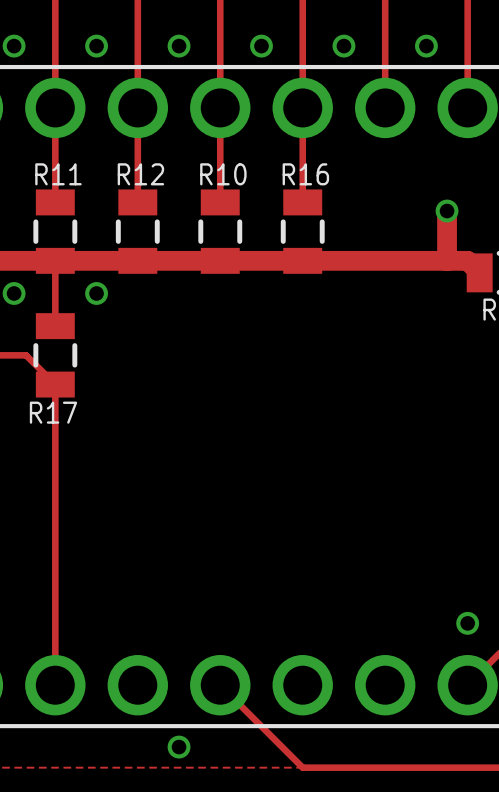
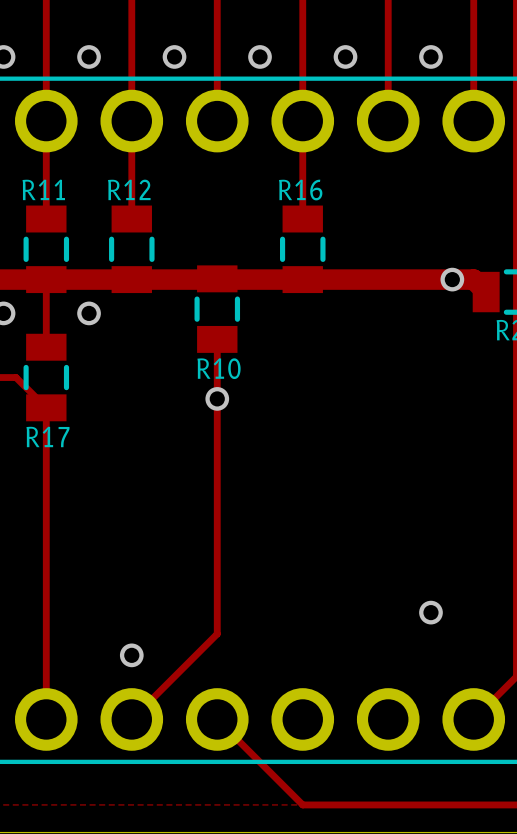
track: (220, 107) (220, 202) -> none
R10 name position: R10 (223, 174) -> R10 (219, 368)
track: (447, 211) (447, 260) -> none
via position: (447, 211) -> (452, 279)
R10 position: (220, 231) -> (217, 309)
track: none -> (217, 339) (217, 633) (131, 719)
via: none -> (217, 398)
via position: (467, 623) -> (430, 612)
via position: (179, 747) -> (131, 655)

